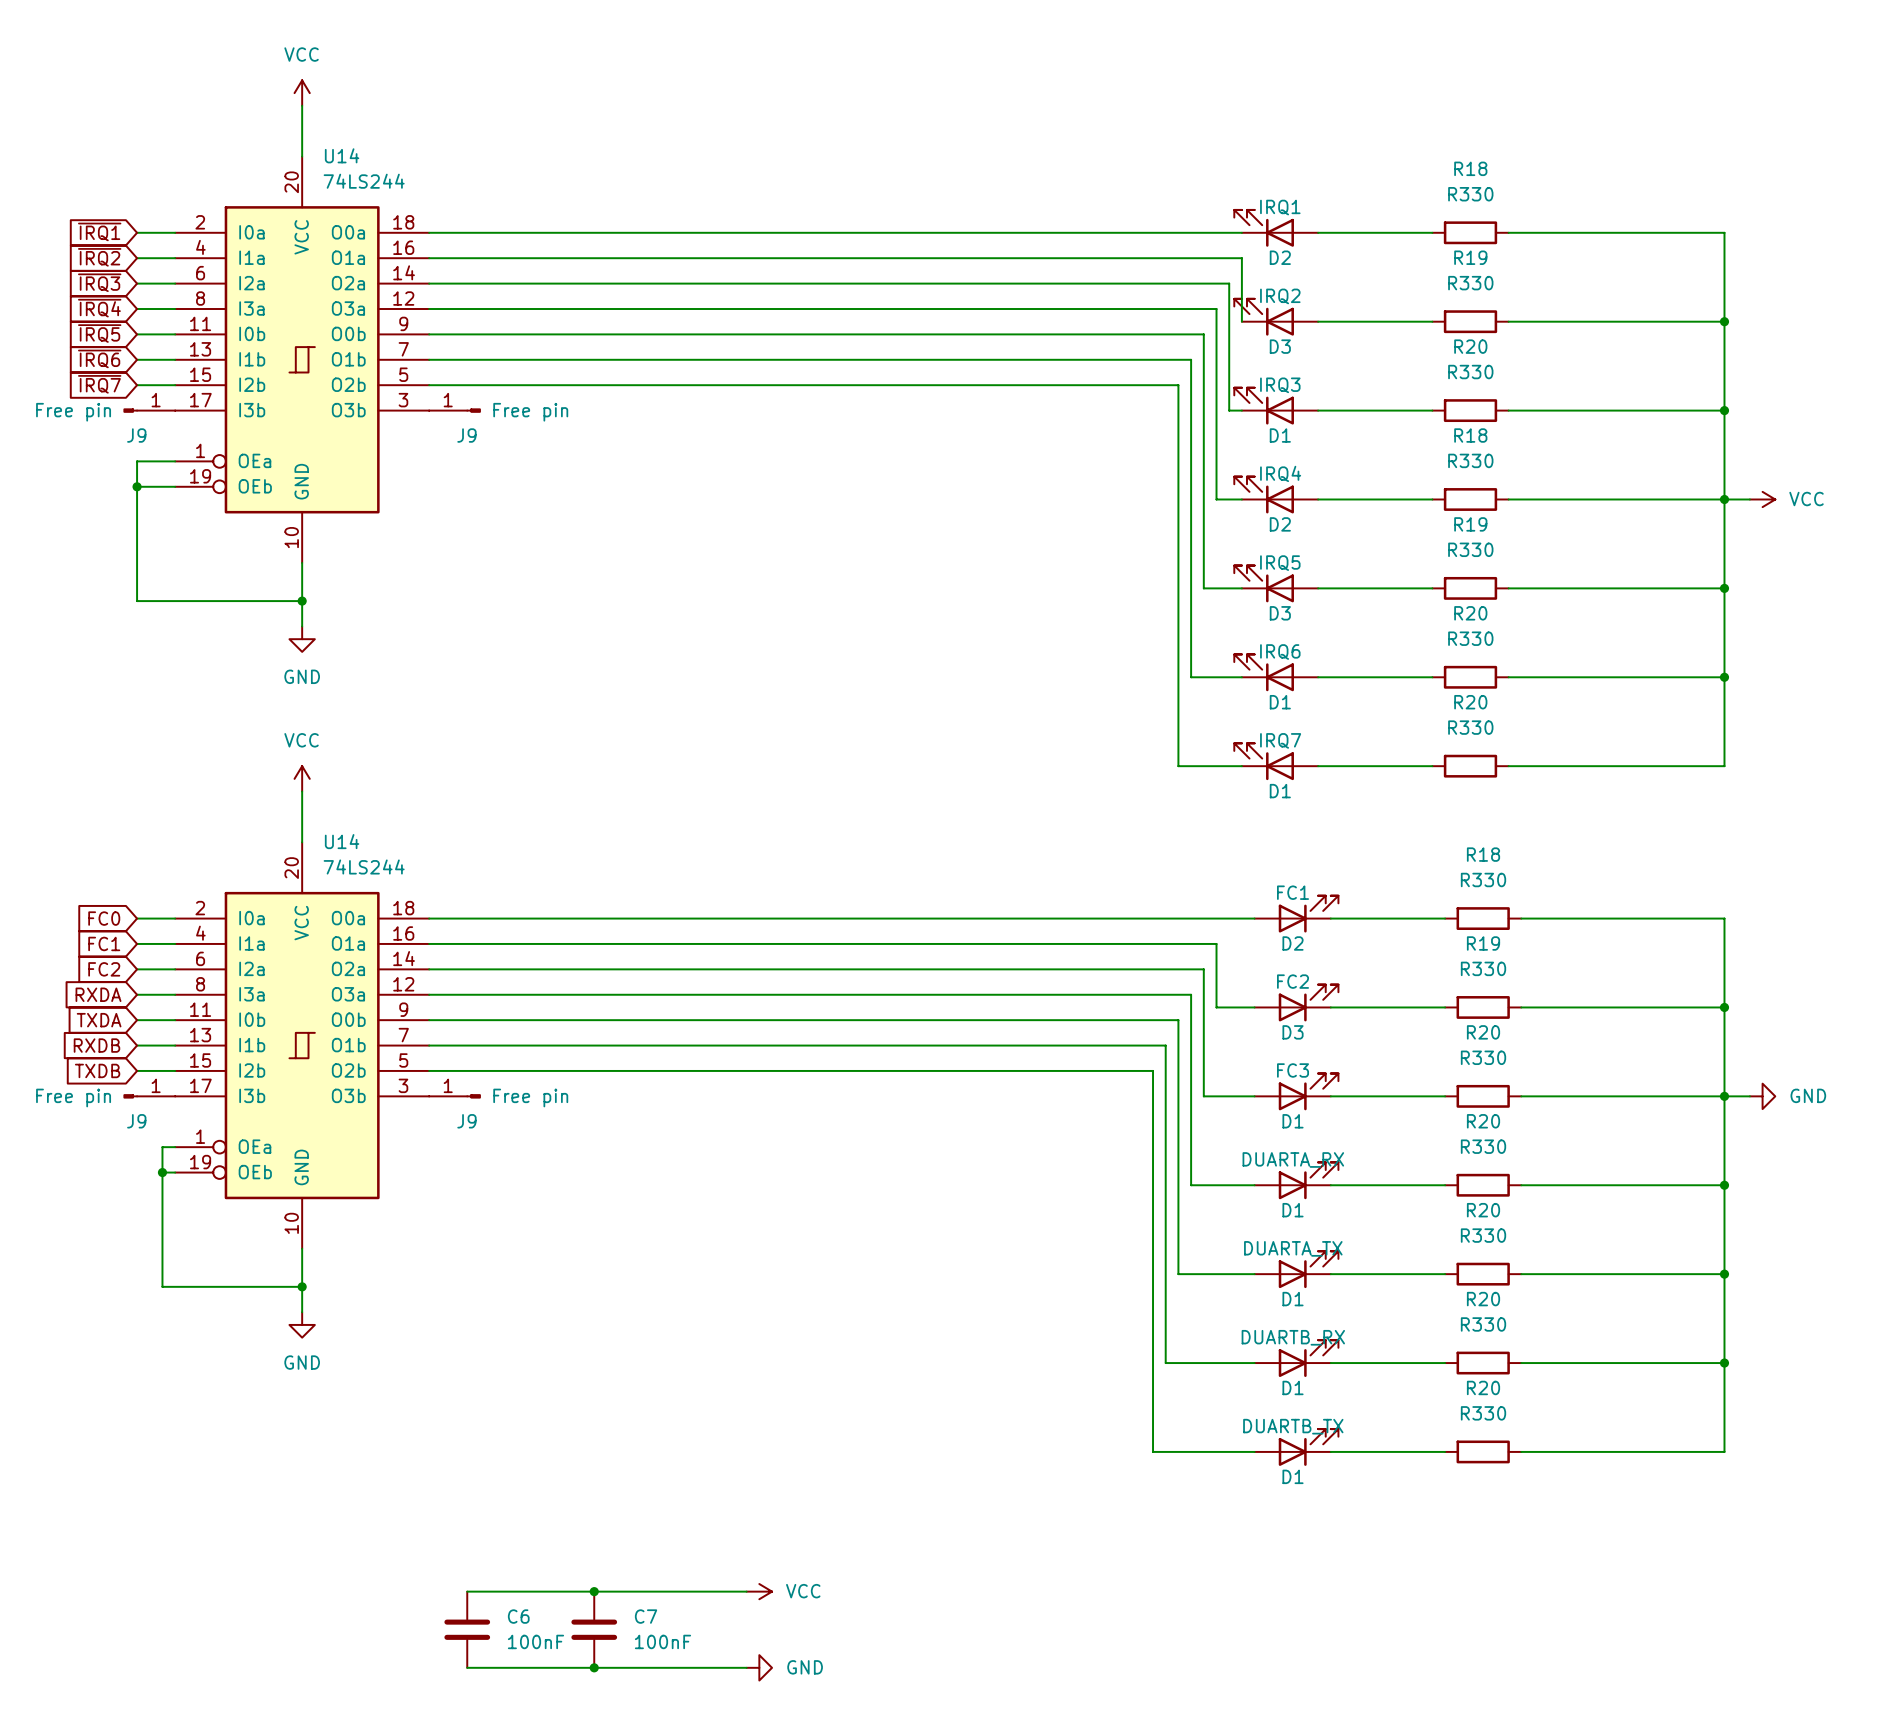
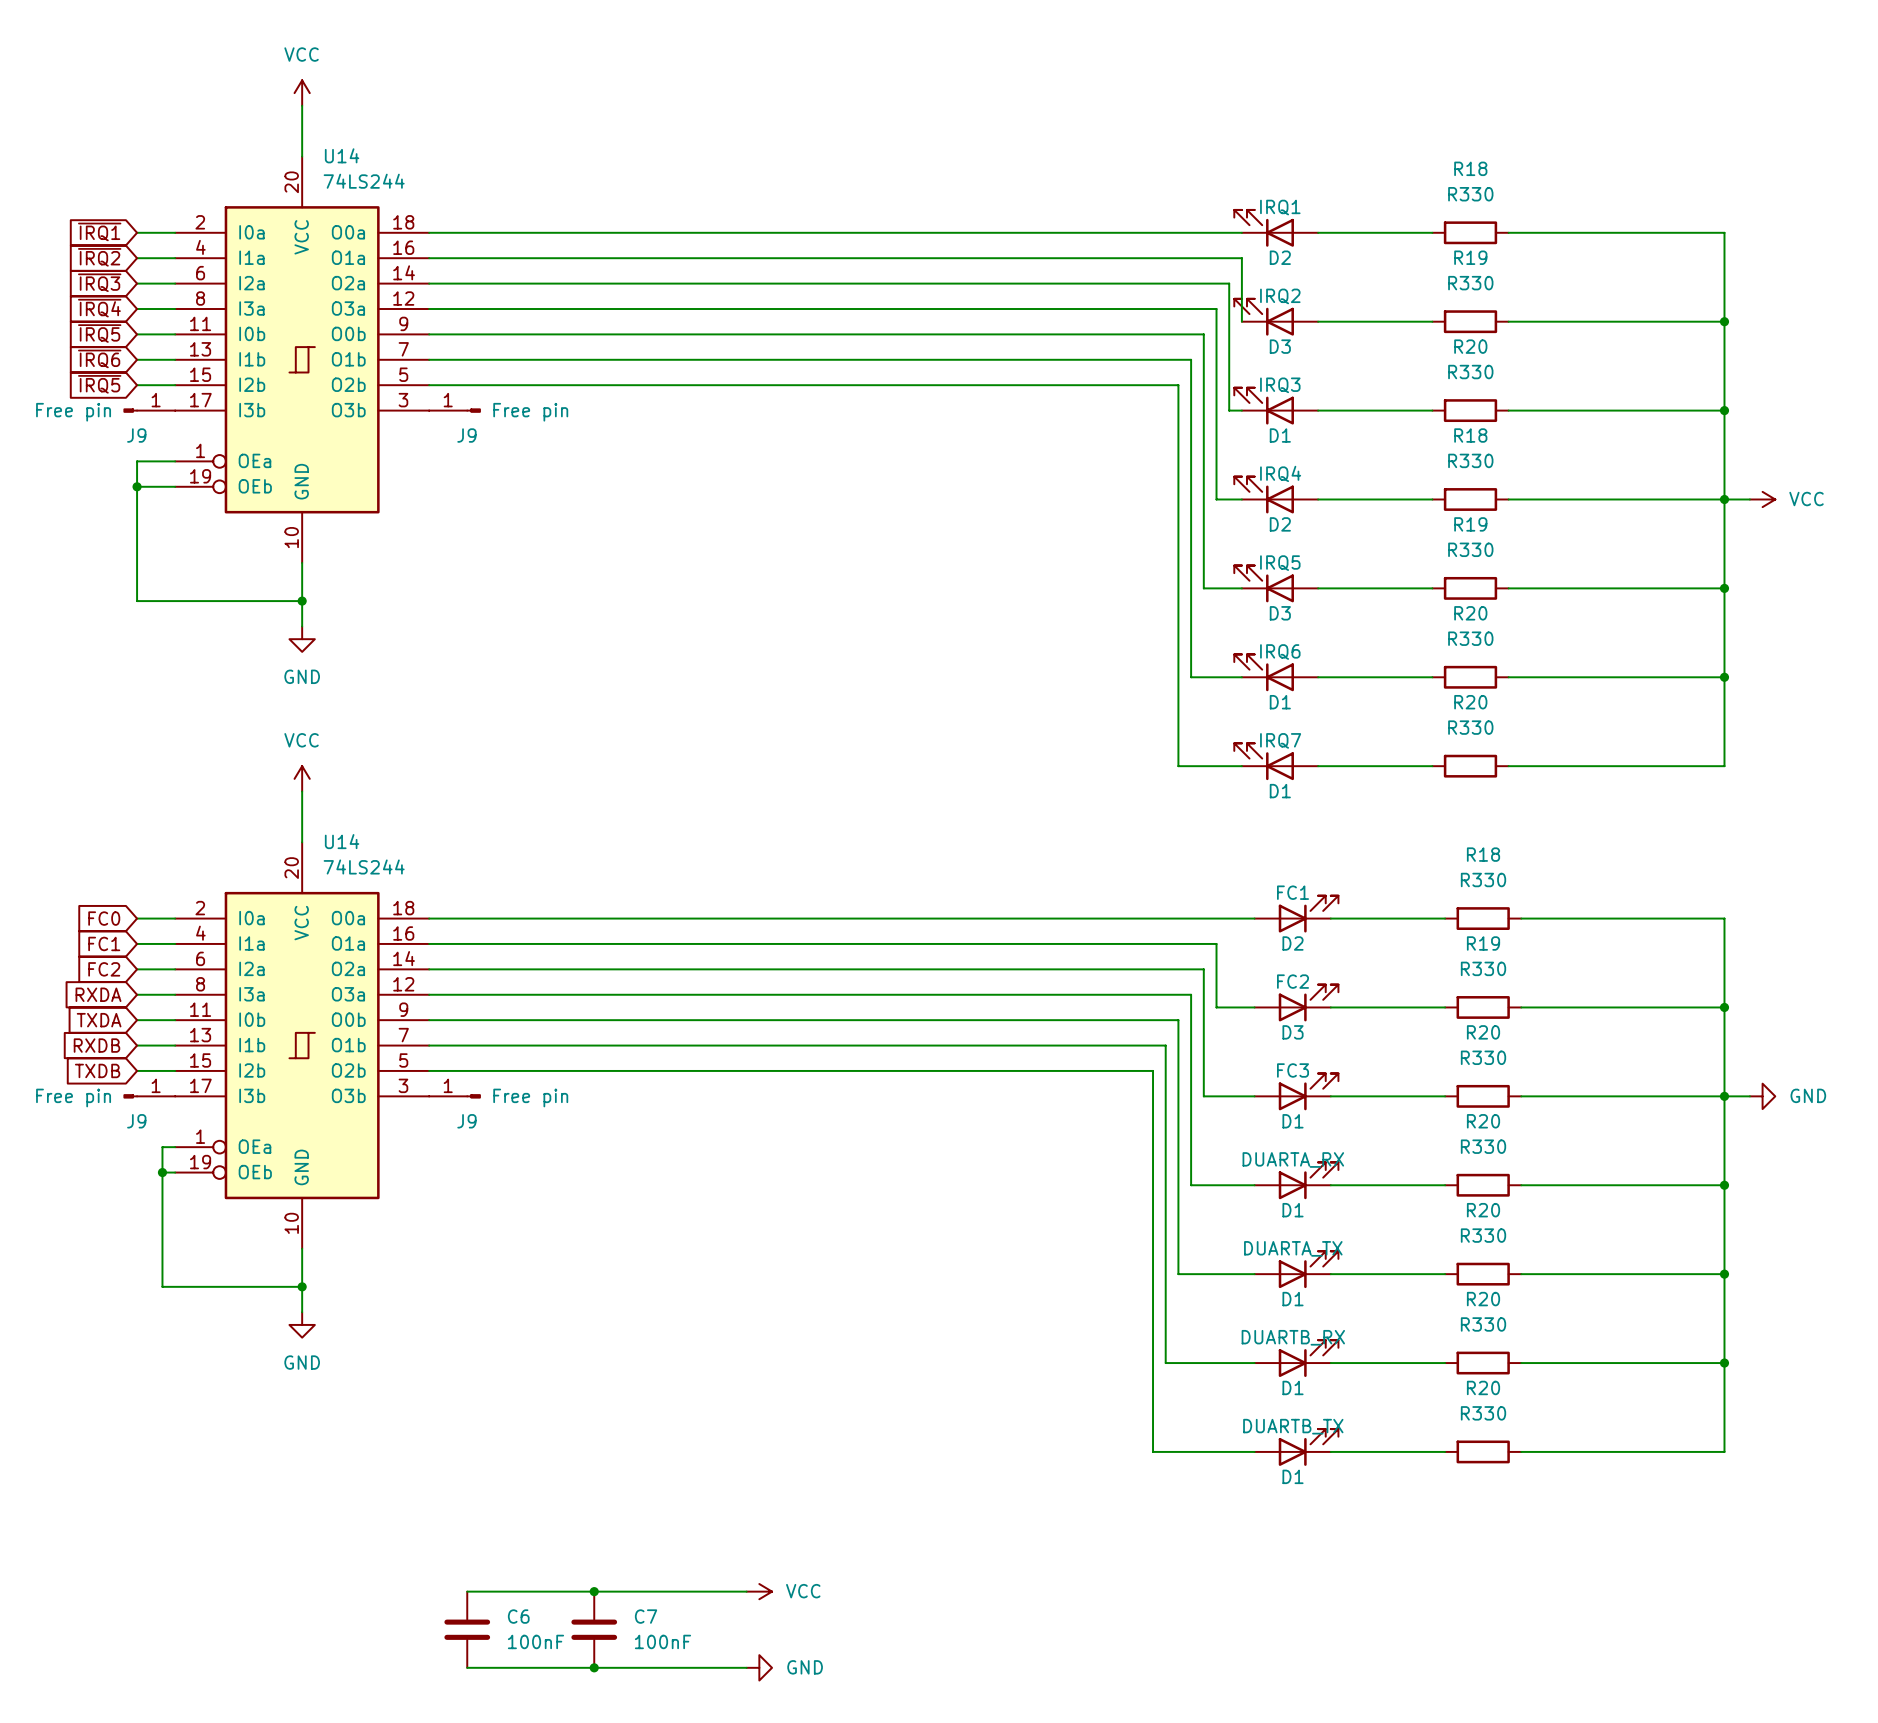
global label: ~{IRQ7} (99, 384) -> ~{IRQ5} (99, 384)

